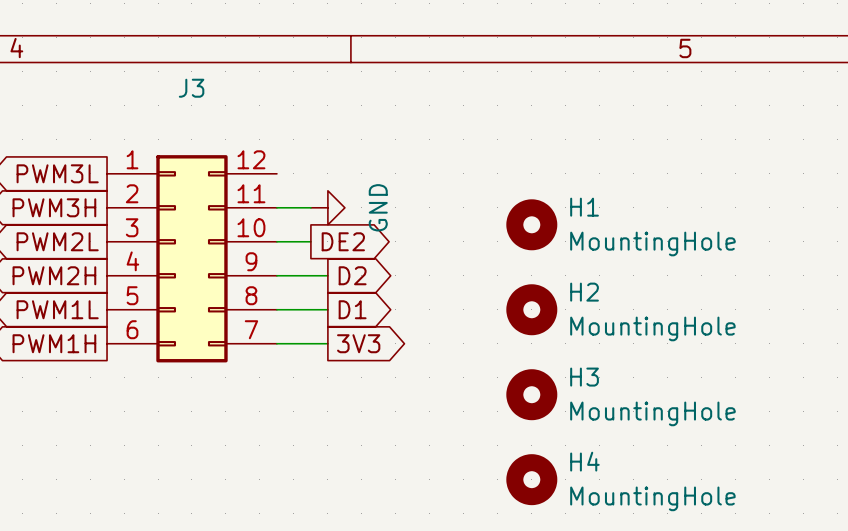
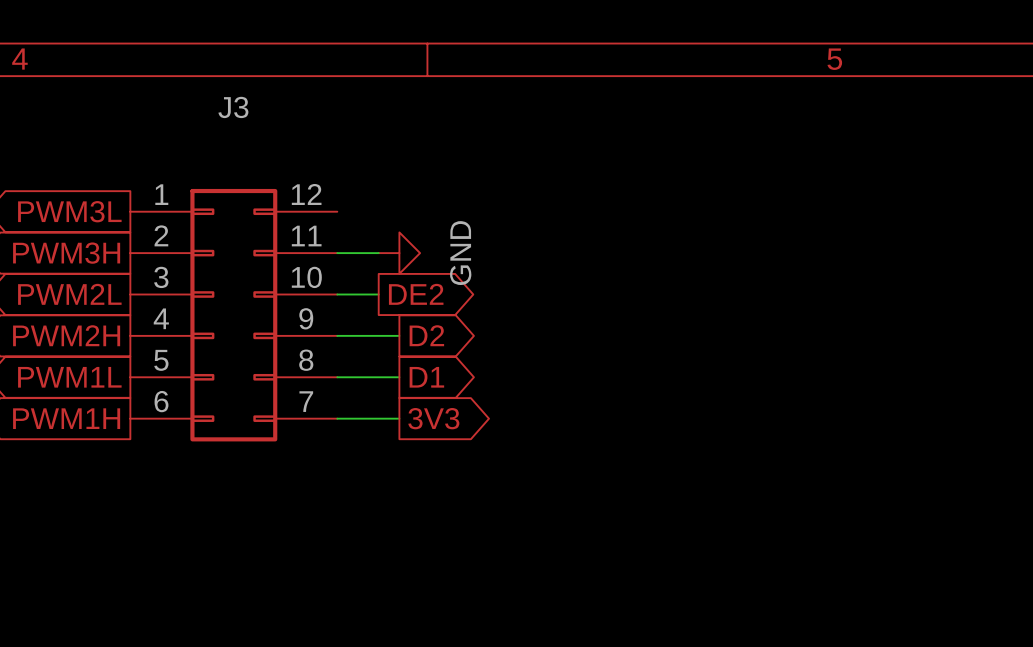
H1: MountingHole (531, 224) -> none
H2: MountingHole (531, 309) -> none
H3: MountingHole (531, 394) -> none
H4: MountingHole (531, 479) -> none

